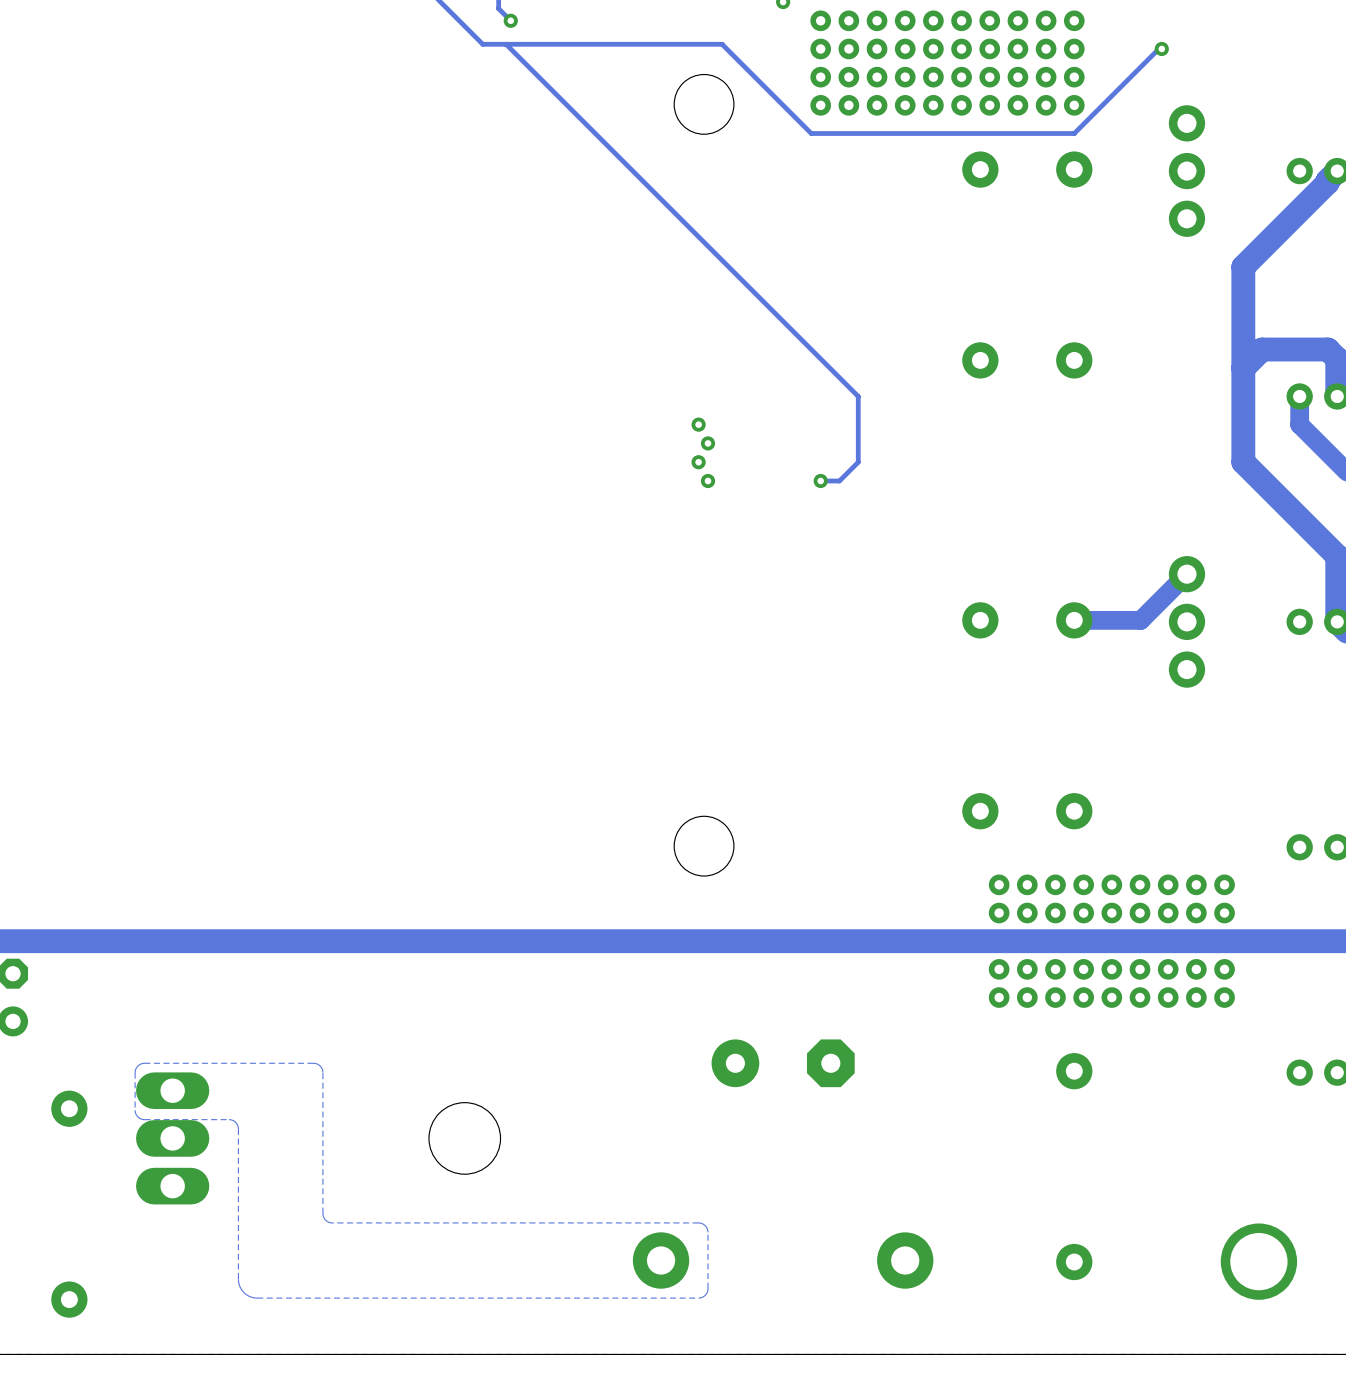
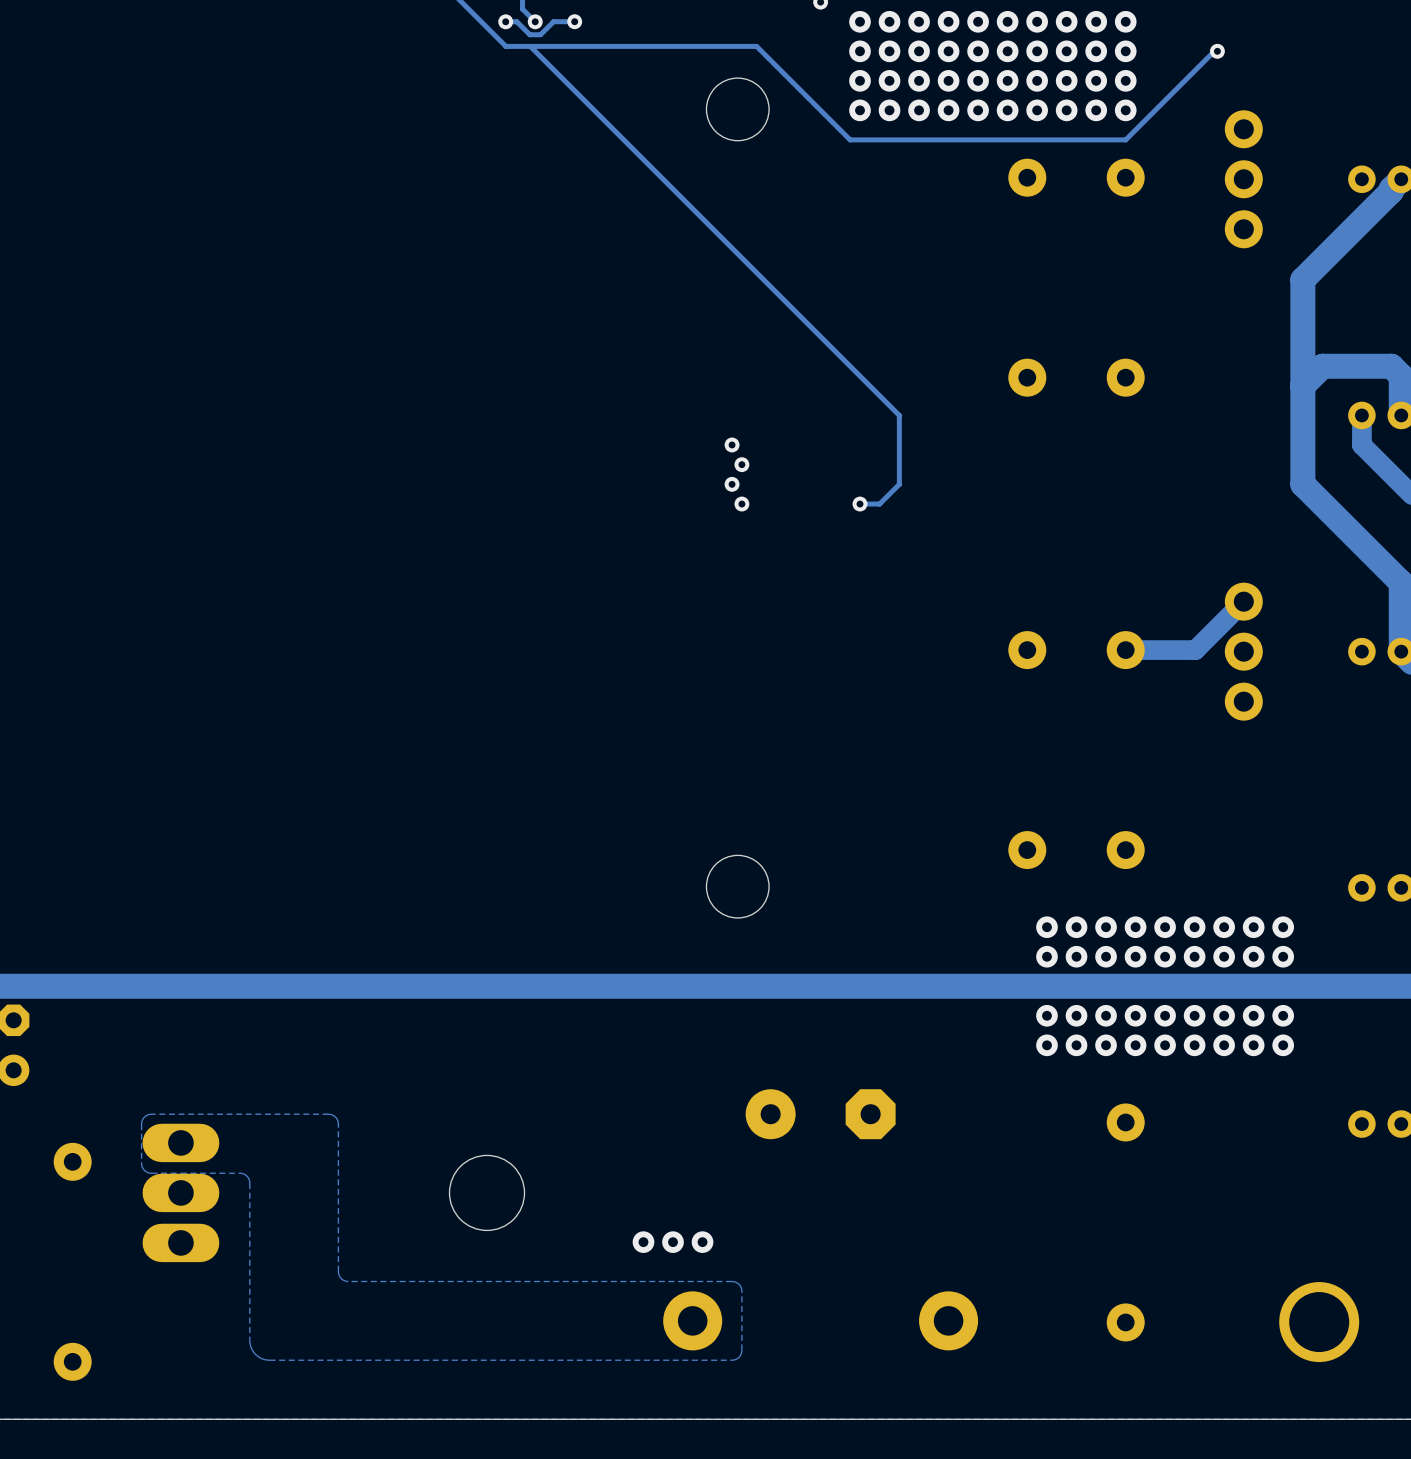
via: none -> (505, 21)
track: none -> (574, 21) (553, 21) (540, 34) (529, 34) (516, 21) (505, 21)
via: none -> (574, 21)
via: none -> (643, 1242)
via: none -> (673, 1242)
via: none -> (702, 1242)

